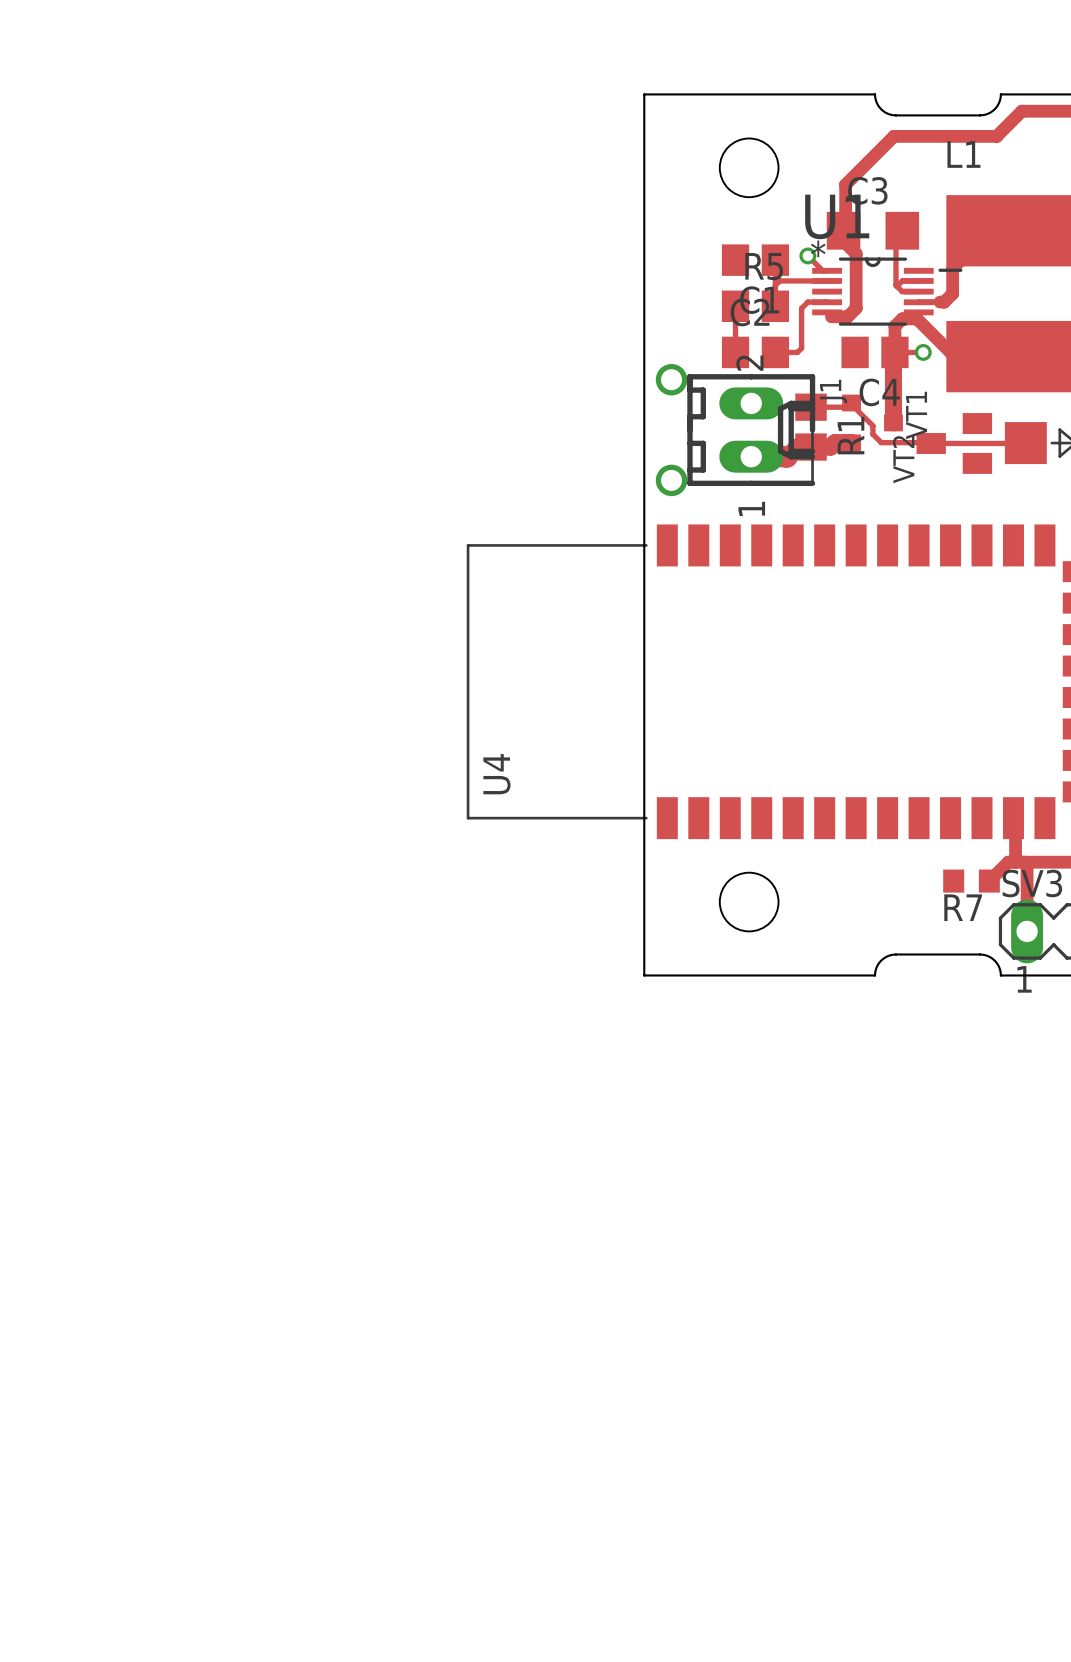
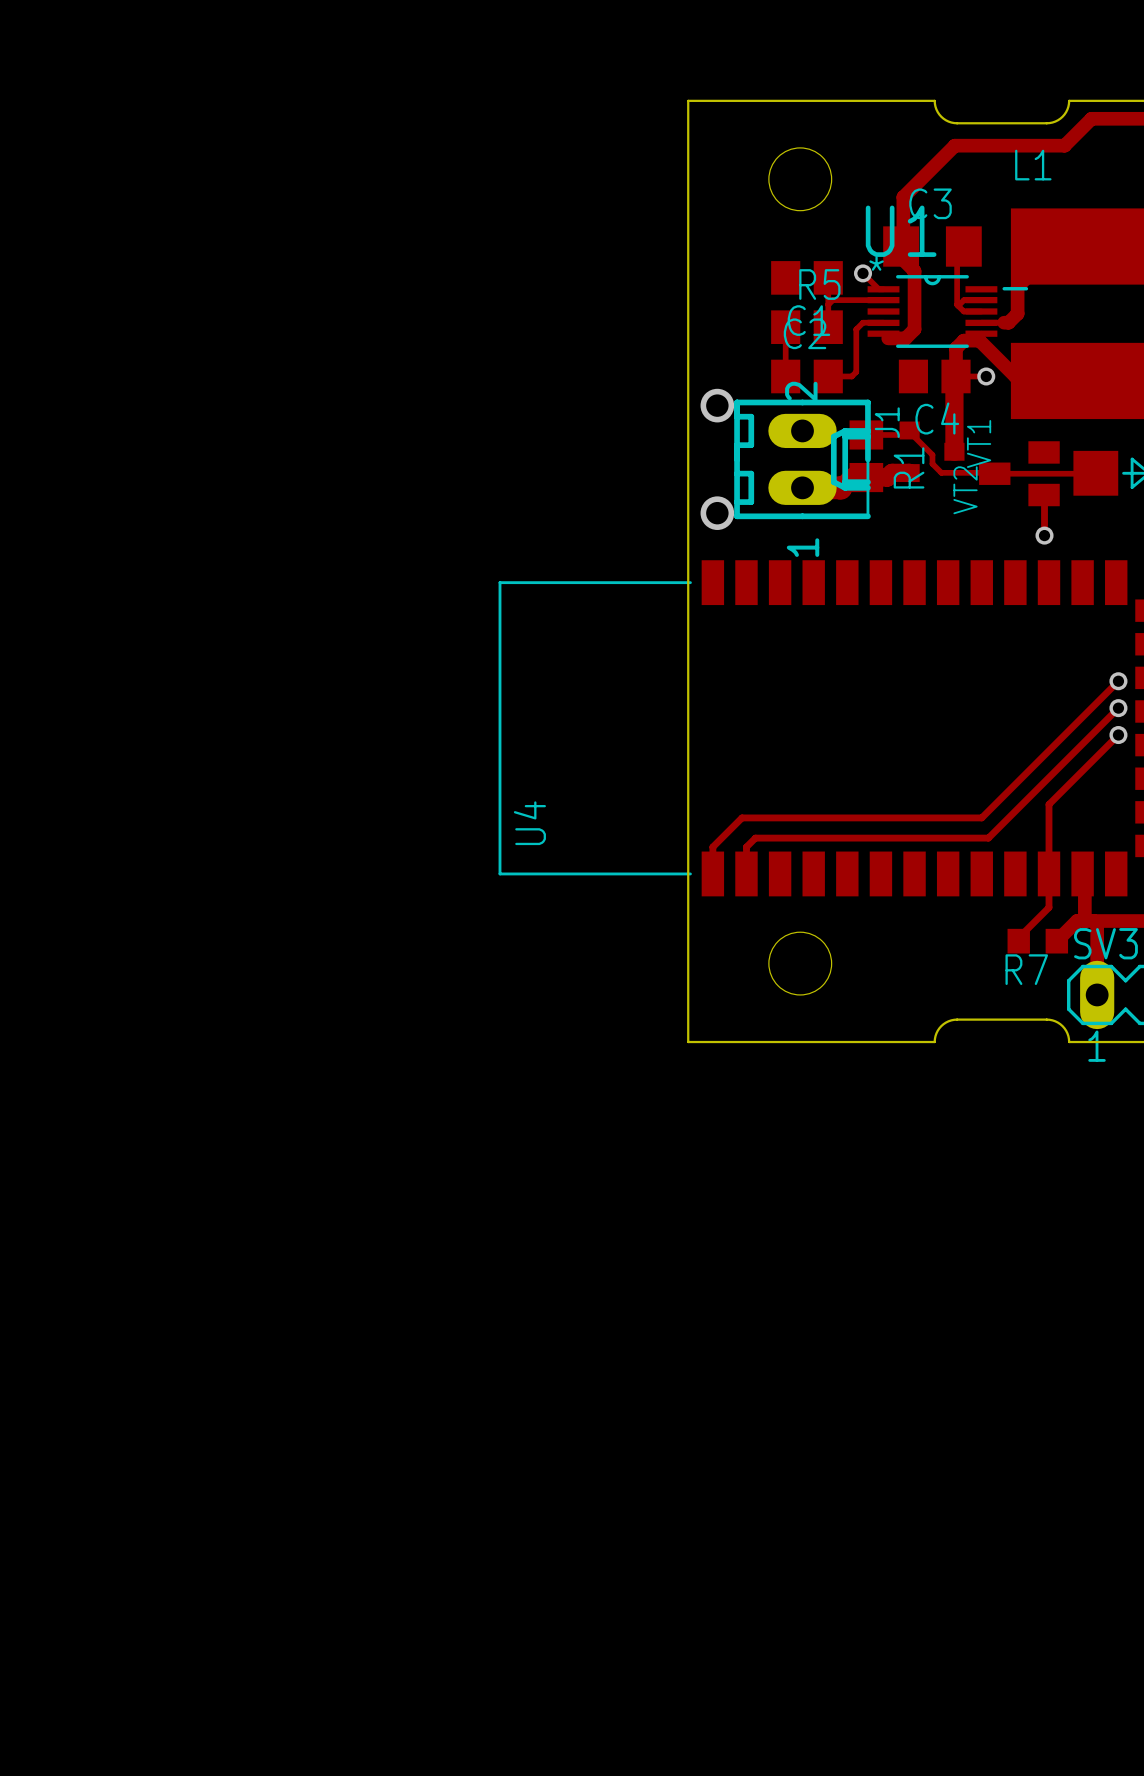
track: none -> (1044, 495) (1044, 535)
via: none -> (1044, 535)
track: none -> (1118, 681) (981, 817) (742, 817) (712, 847) (712, 873)
via: none -> (1118, 681)
track: none -> (1118, 708) (988, 838) (755, 838) (746, 847) (746, 873) (748, 871)
via: none -> (1118, 708)
track: none -> (1118, 735) (1048, 804) (1048, 907) (1018, 937) (1018, 941)
via: none -> (1118, 735)

